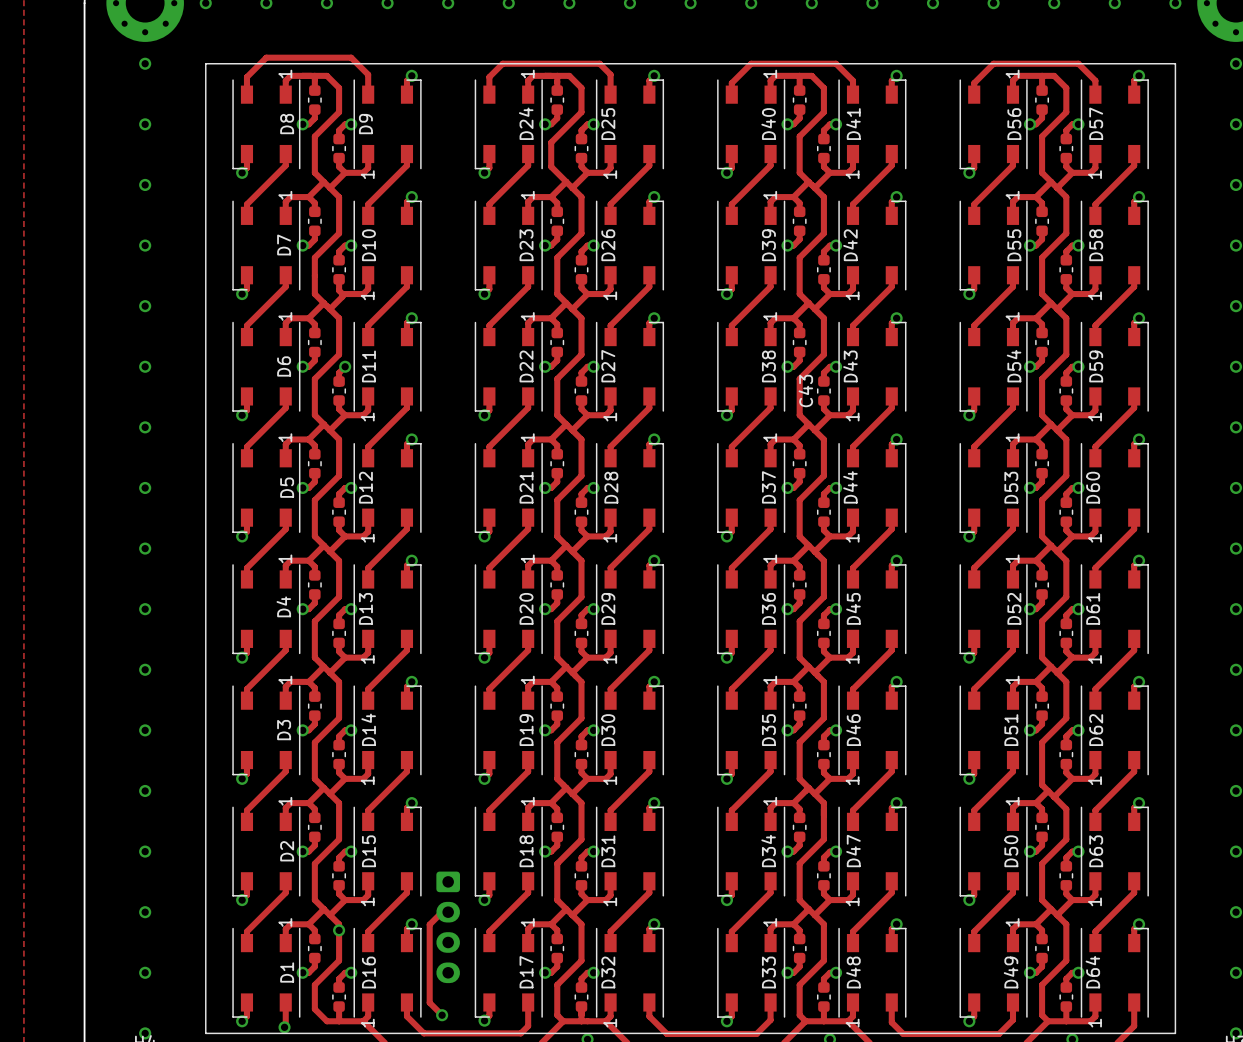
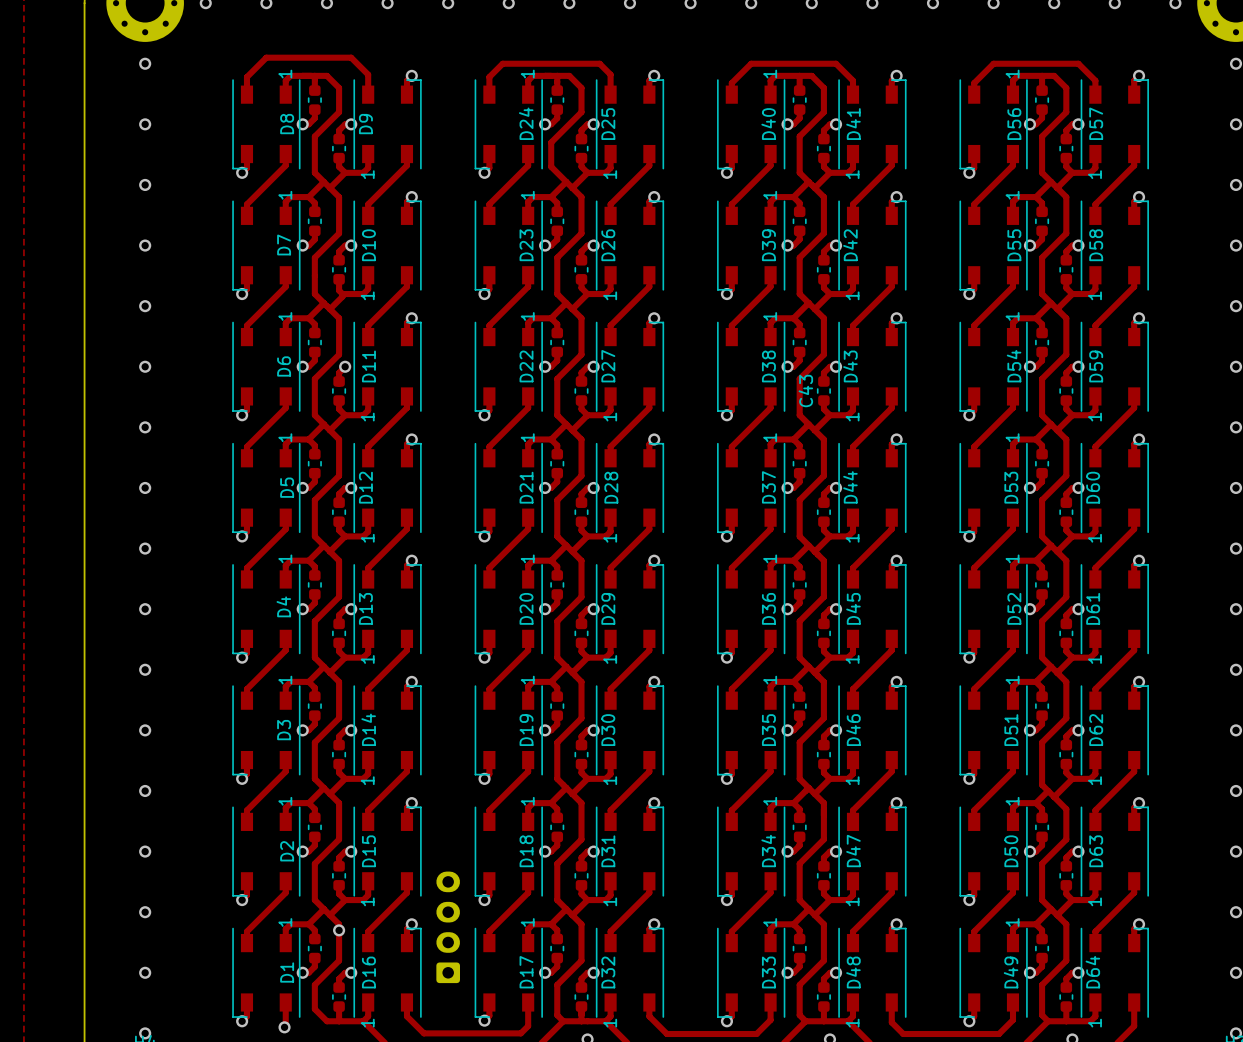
line: (205, 63) (205, 1033) (1175, 1033) (1175, 63) (205, 63) -> none
track: (448, 912) (442, 912) (429, 924) (429, 1002) (442, 1015) -> none
part rotation: 0° (448, 927) -> 180° (448, 927)
via: (442, 1015) -> none

